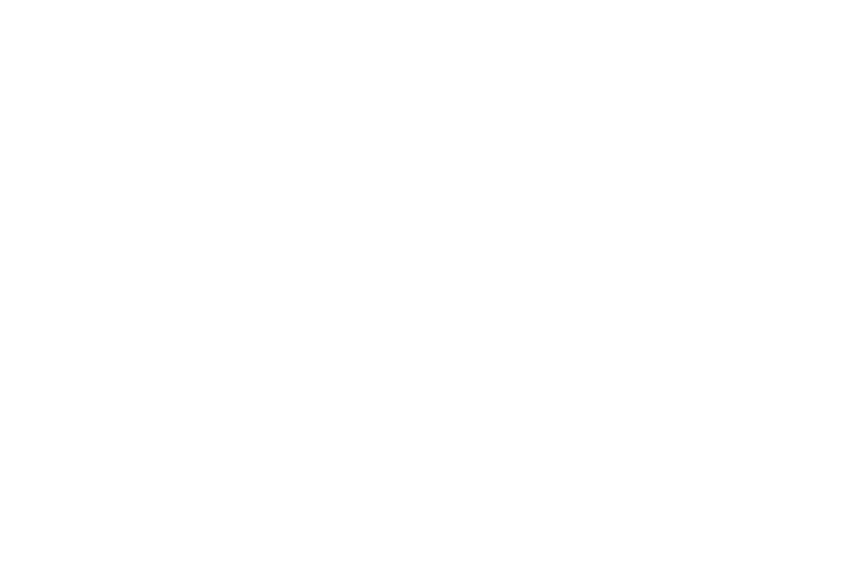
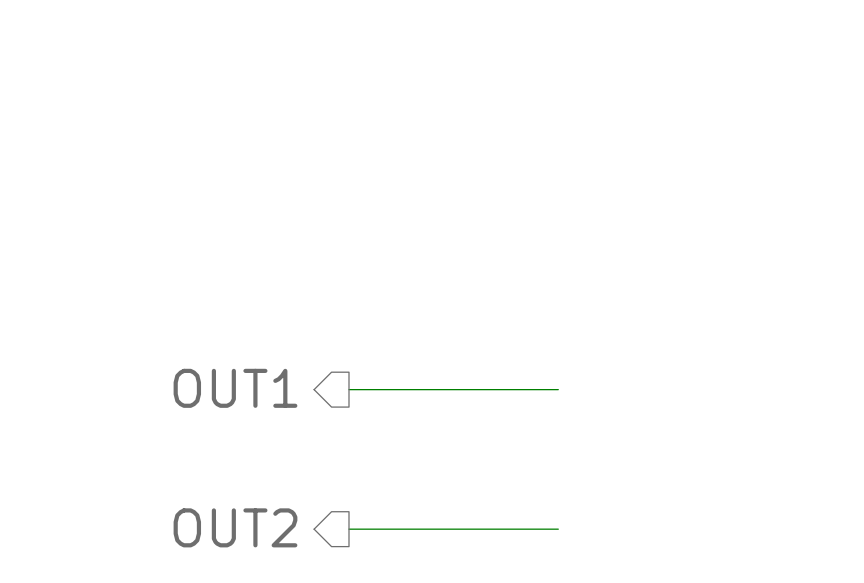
hierarchical label: none -> OUT1 (235, 388)
wire: none -> (348, 389) (558, 389)
hierarchical label: none -> OUT2 (235, 527)
wire: none -> (348, 529) (558, 529)

